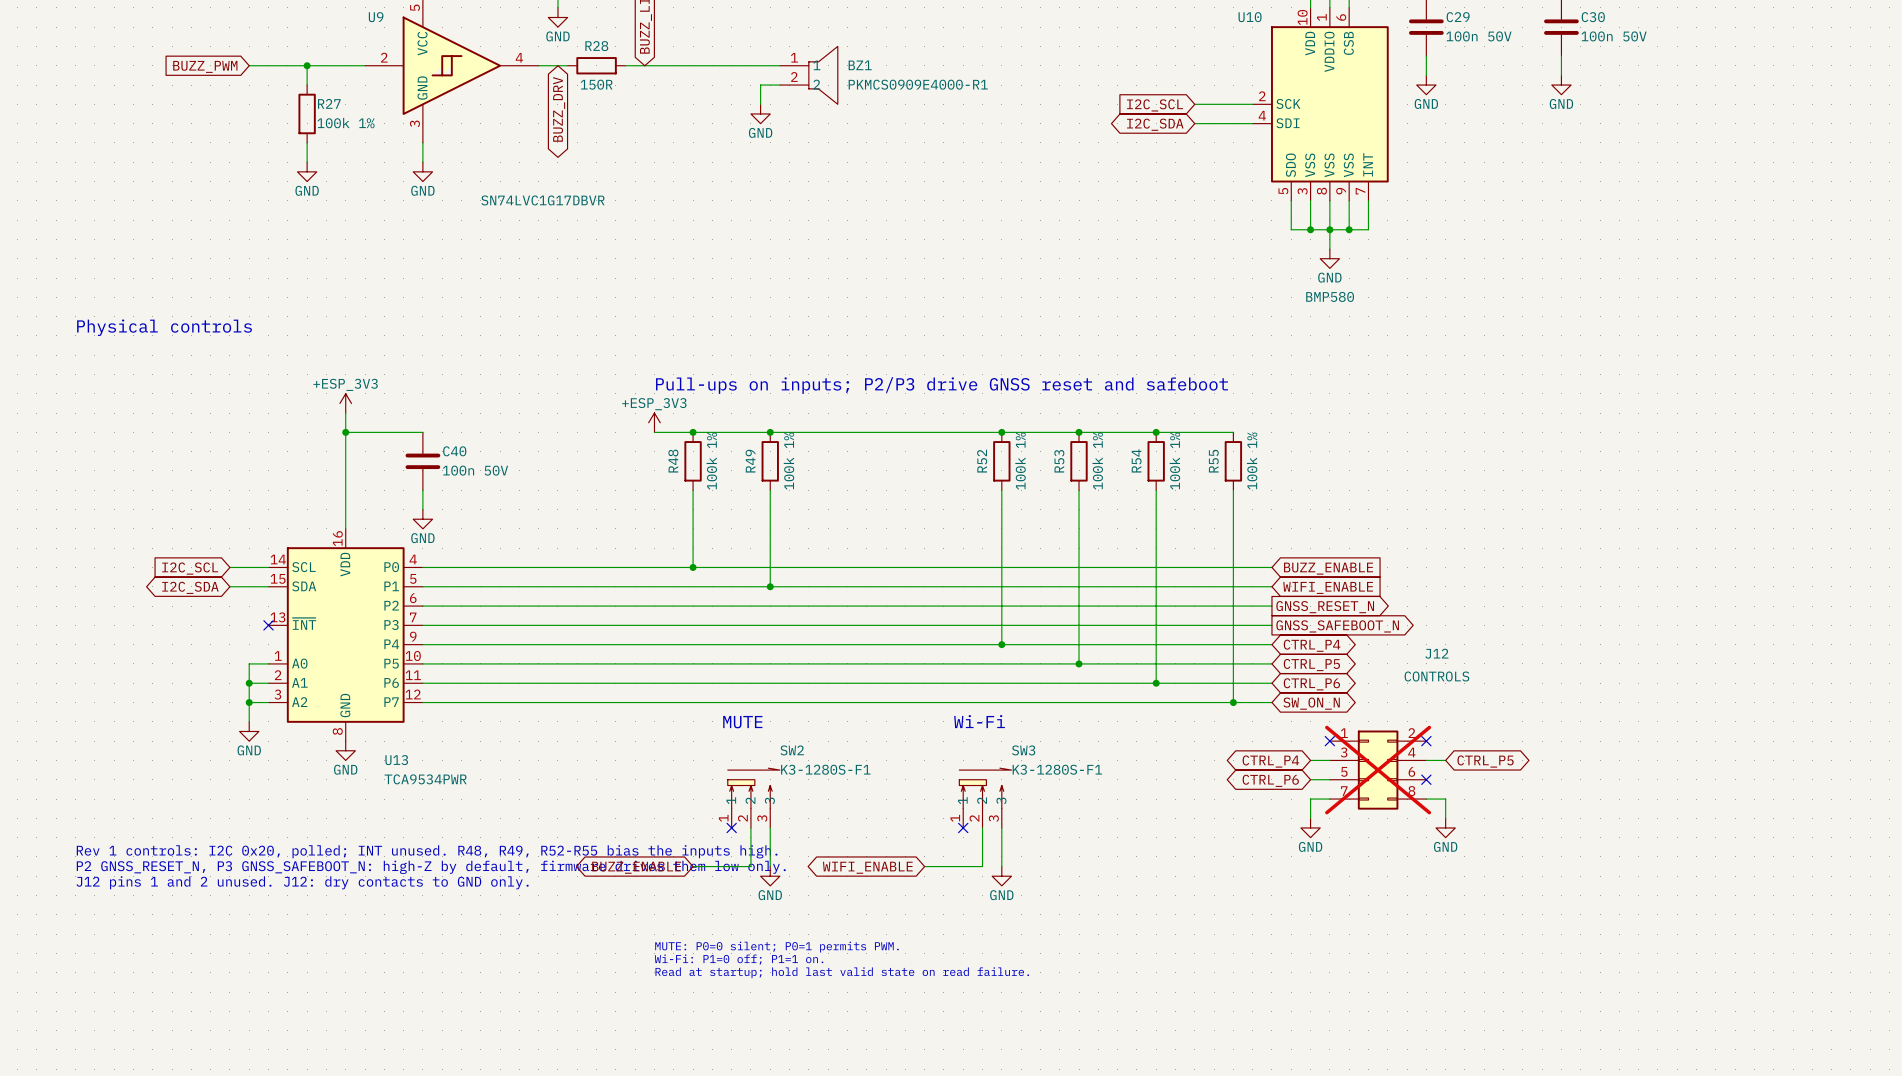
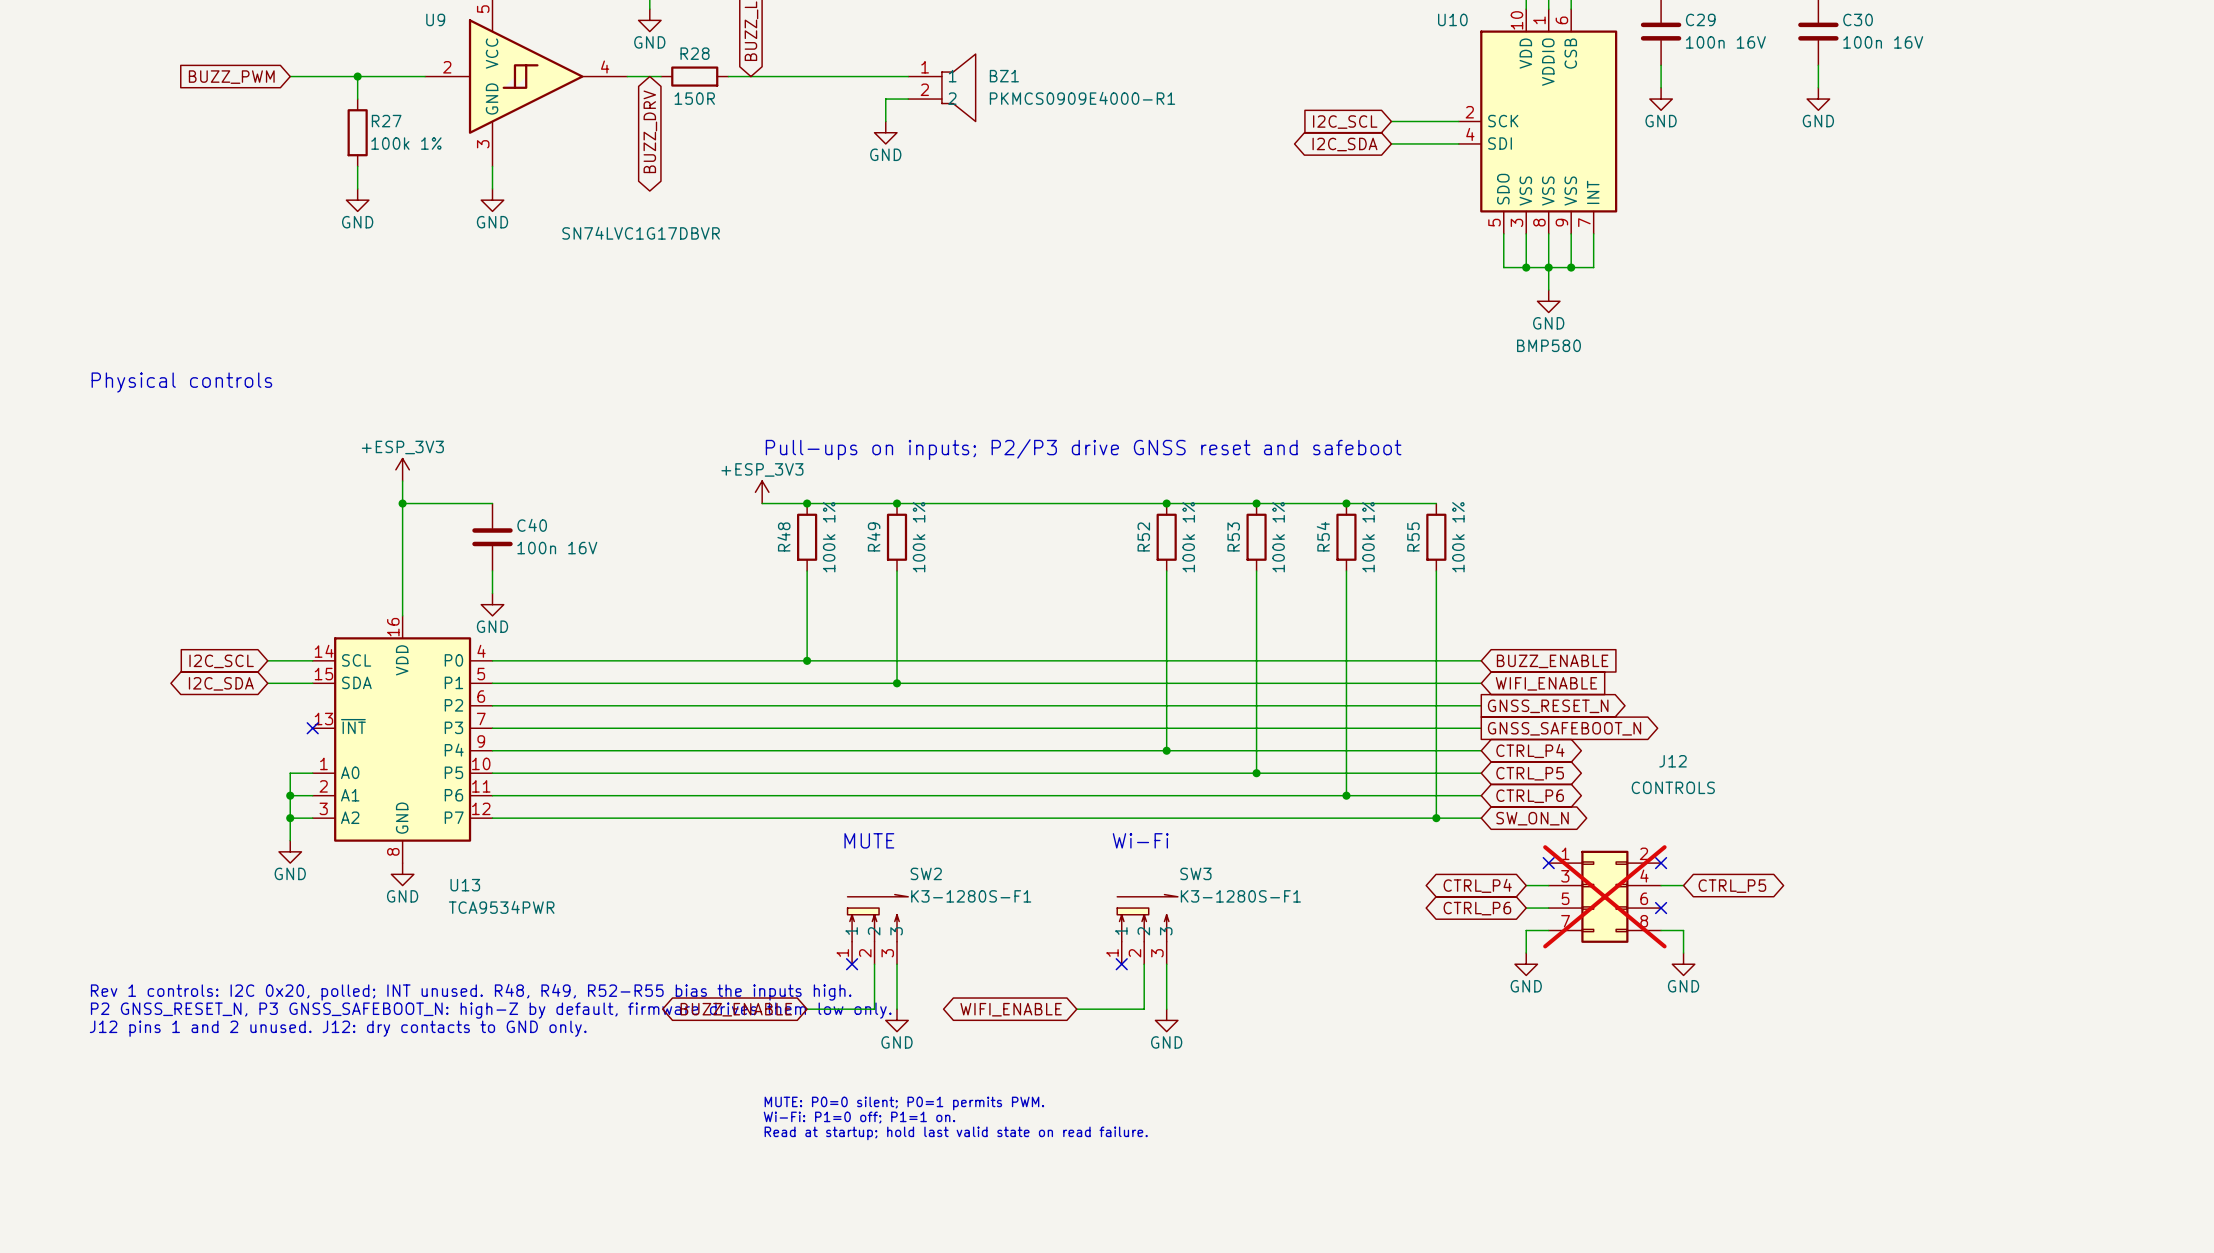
C29 value: 100n 50V (1478, 36) -> 100n 16V (1725, 42)
C30 value: 100n 50V (1614, 36) -> 100n 16V (1883, 42)
C40 value: 100n 50V (475, 470) -> 100n 16V (557, 548)

